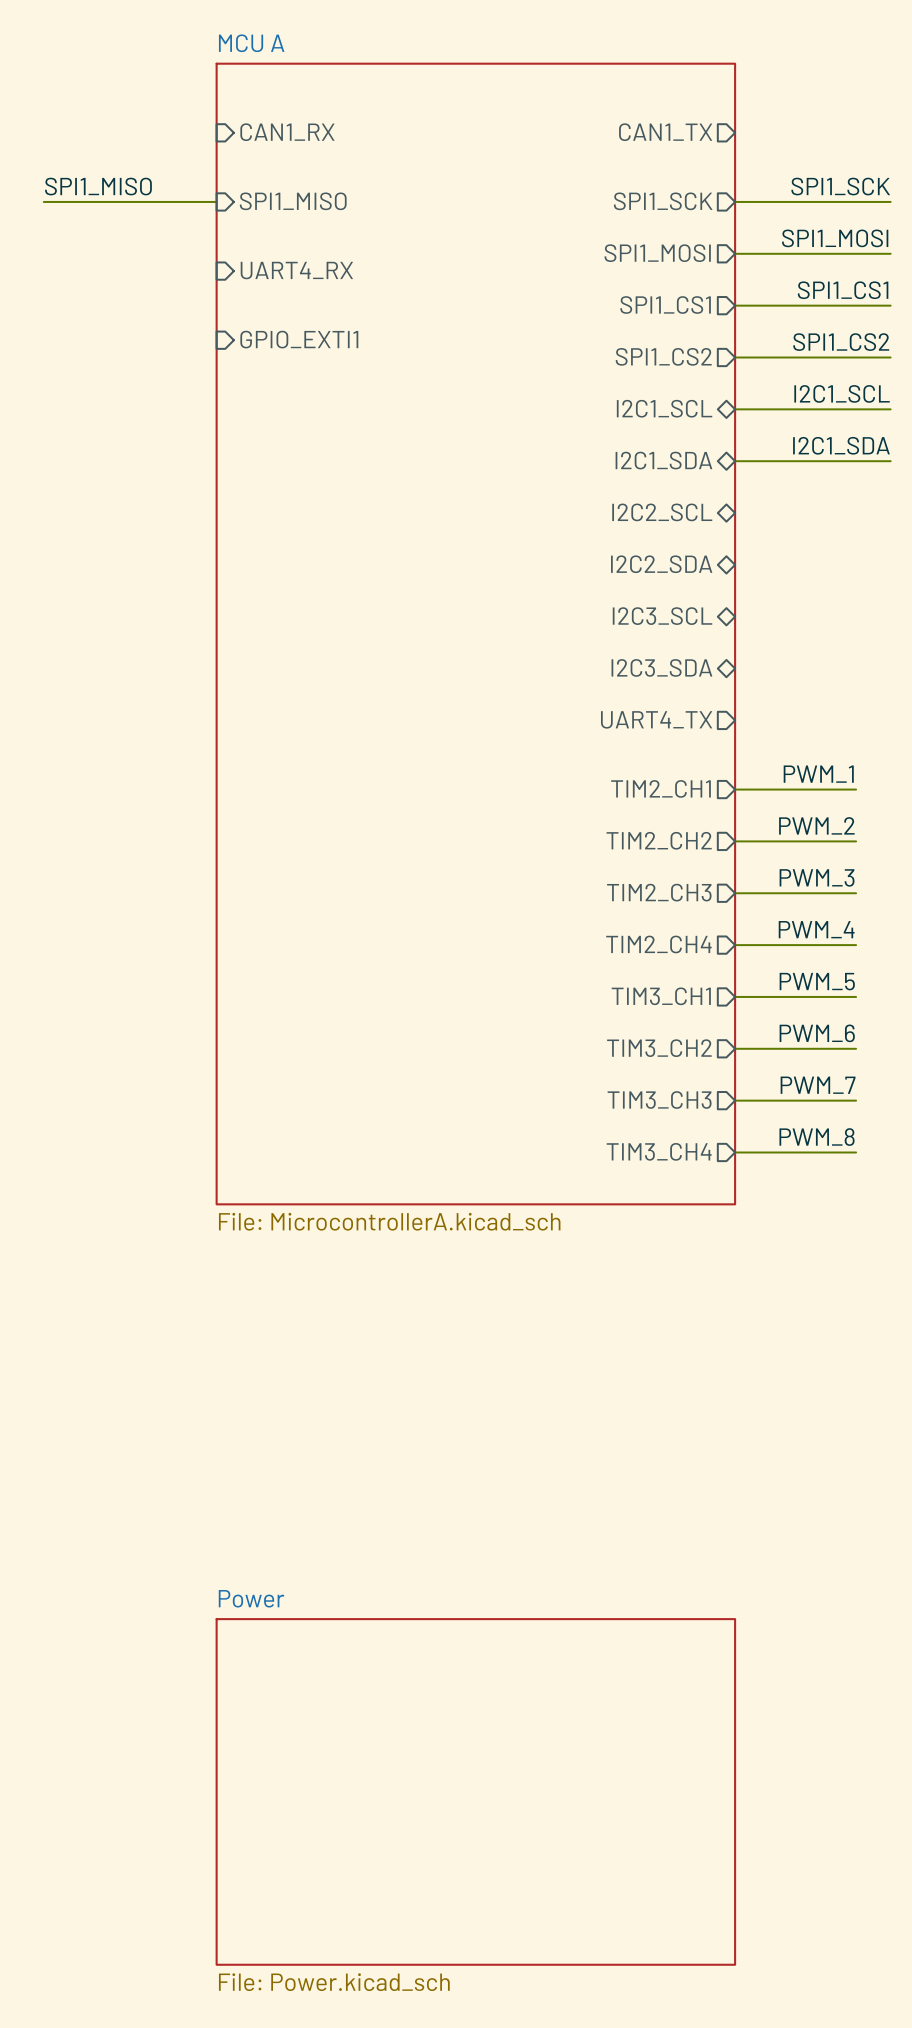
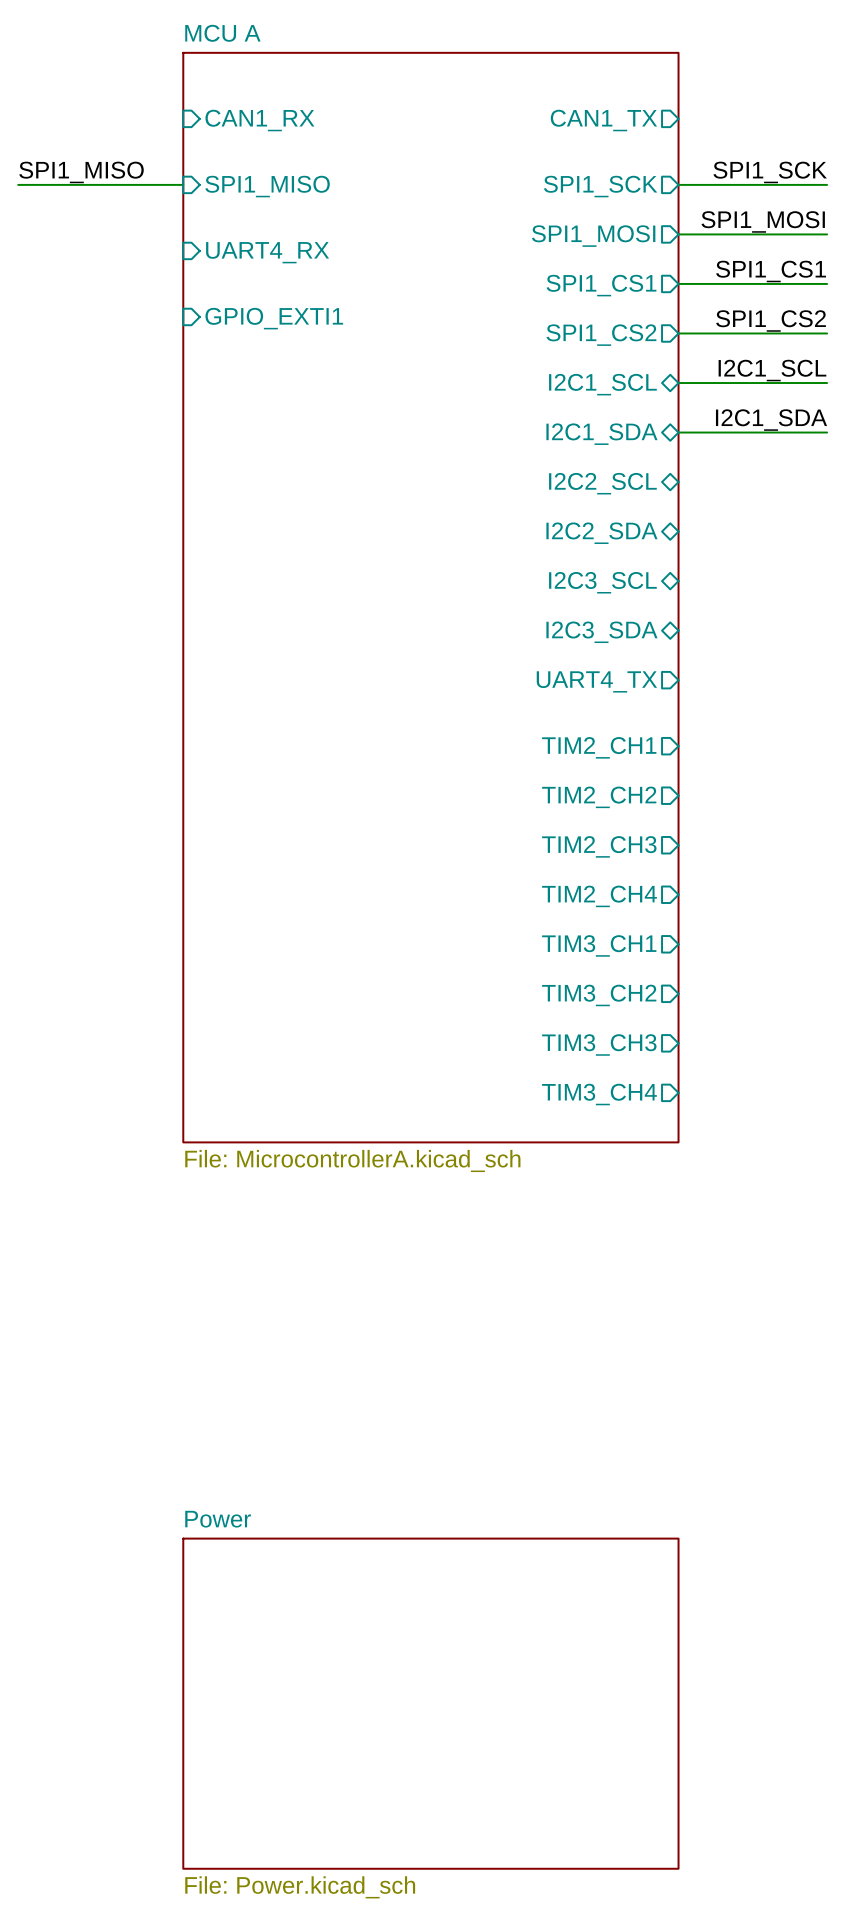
label: PWM_1 (818, 774) -> none
wire: (735, 789) (856, 789) -> none
label: PWM_2 (816, 825) -> none
wire: (735, 841) (856, 841) -> none
label: PWM_3 (817, 877) -> none
wire: (735, 893) (856, 893) -> none
label: PWM_4 (816, 929) -> none
wire: (735, 945) (856, 945) -> none
label: PWM_5 (817, 981) -> none
wire: (735, 996) (856, 996) -> none
label: PWM_6 (817, 1033) -> none
wire: (735, 1048) (856, 1048) -> none
label: PWM_7 (818, 1085) -> none
wire: (735, 1100) (856, 1100) -> none
label: PWM_8 (817, 1137) -> none
wire: (735, 1152) (856, 1152) -> none

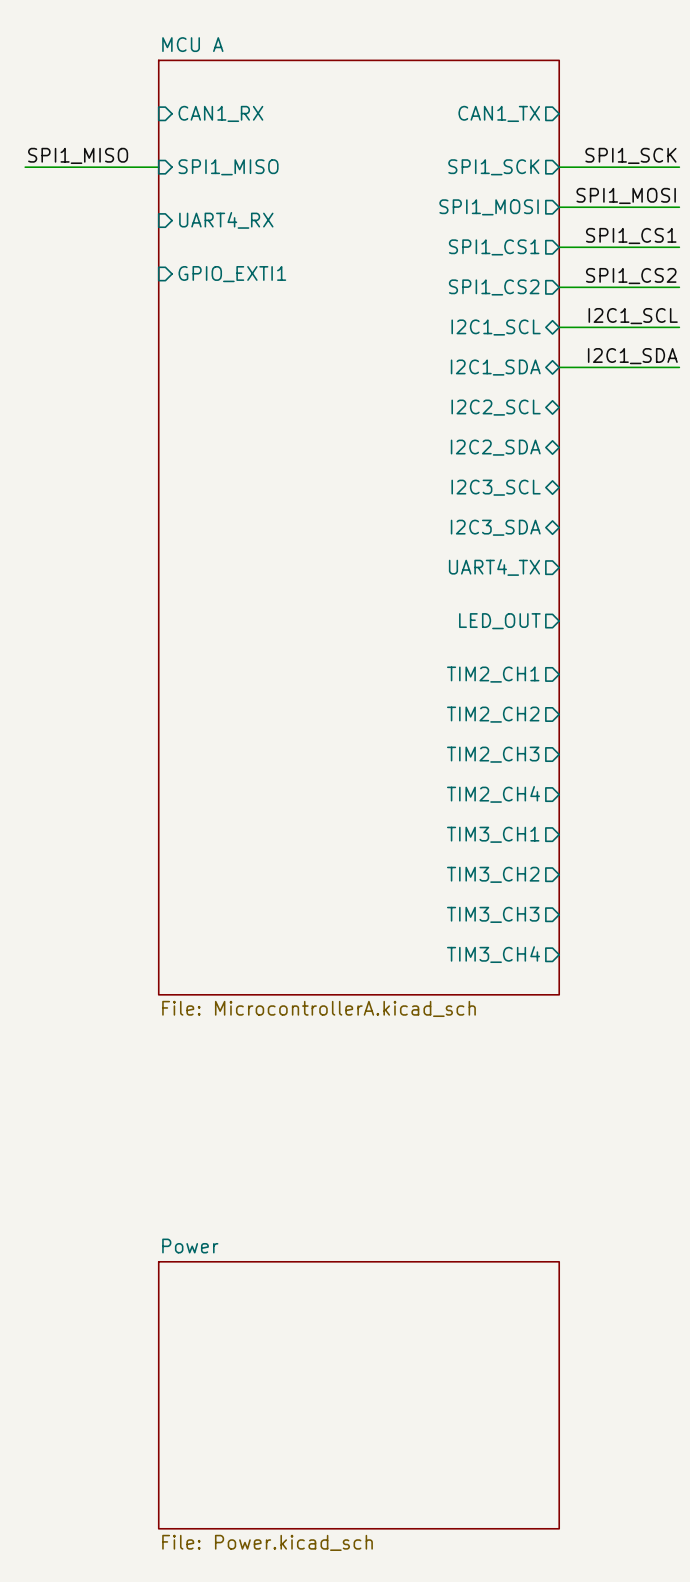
sheet MCU A: File: MicrocontrollerA.kicad_sch (430, 597) -> none
sheet MCU A: none -> File: MicrocontrollerA.kicad_sch (358, 527)
sheet pin: TIM2_CH1 (599, 747) -> LED_OUT (499, 621)
sheet pin position: TIM2_CH2 (599, 797) -> TIM2_CH2 (493, 714)
sheet pin: none -> TIM2_CH1 (493, 674)
sheet pin position: TIM2_CH3 (599, 846) -> TIM2_CH3 (493, 754)
sheet pin position: TIM2_CH4 (599, 896) -> TIM2_CH4 (493, 794)
sheet pin position: TIM3_CH1 (599, 945) -> TIM3_CH1 (493, 834)
sheet pin position: TIM3_CH2 (599, 995) -> TIM3_CH2 (493, 874)
sheet pin position: TIM3_CH3 (599, 1044) -> TIM3_CH3 (493, 914)
sheet pin position: TIM3_CH4 (599, 1094) -> TIM3_CH4 (493, 954)

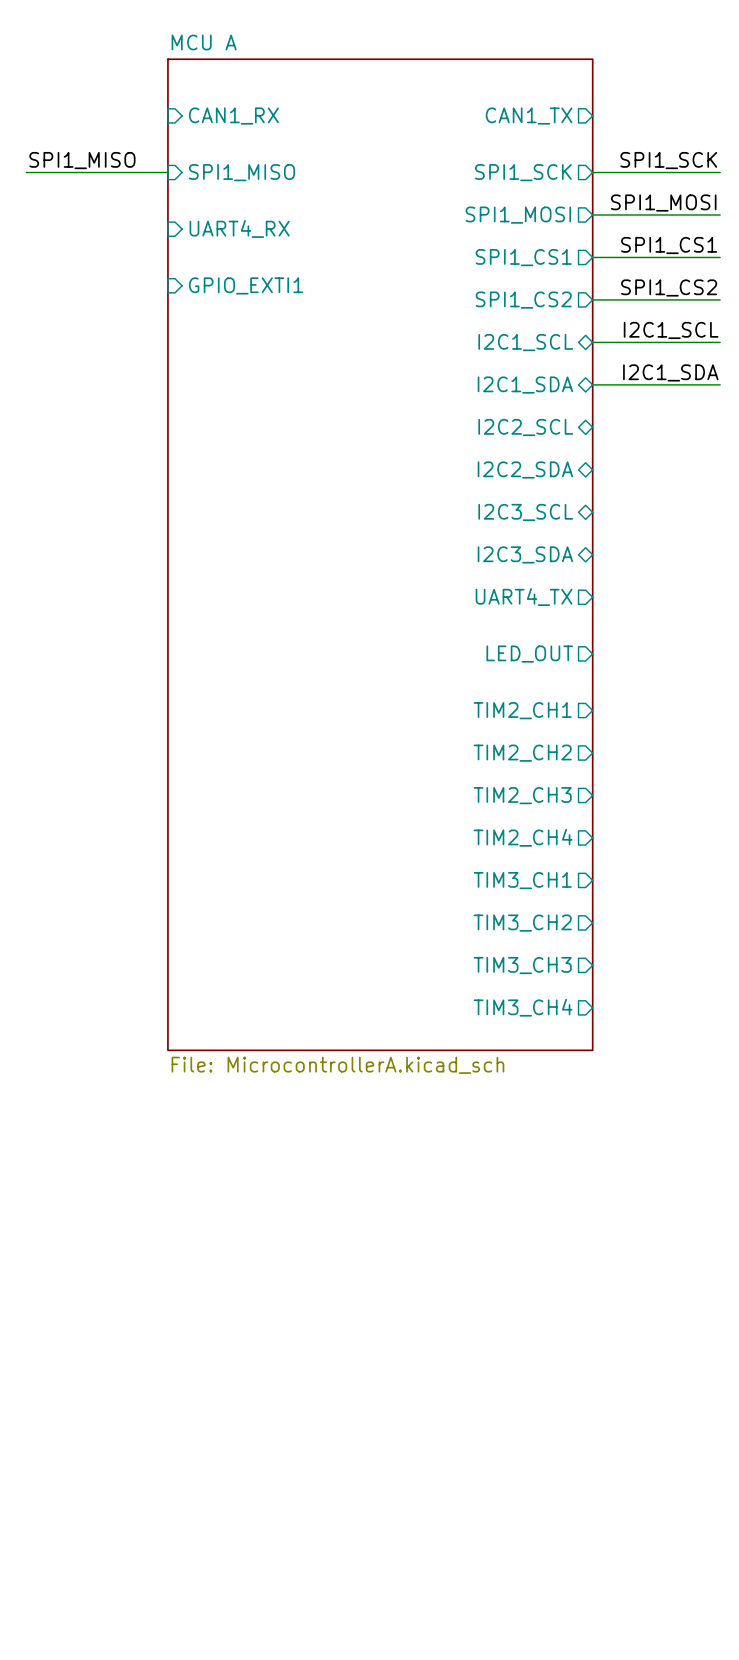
sheet Power: File: Power.kicad_sch (358, 1395) -> none

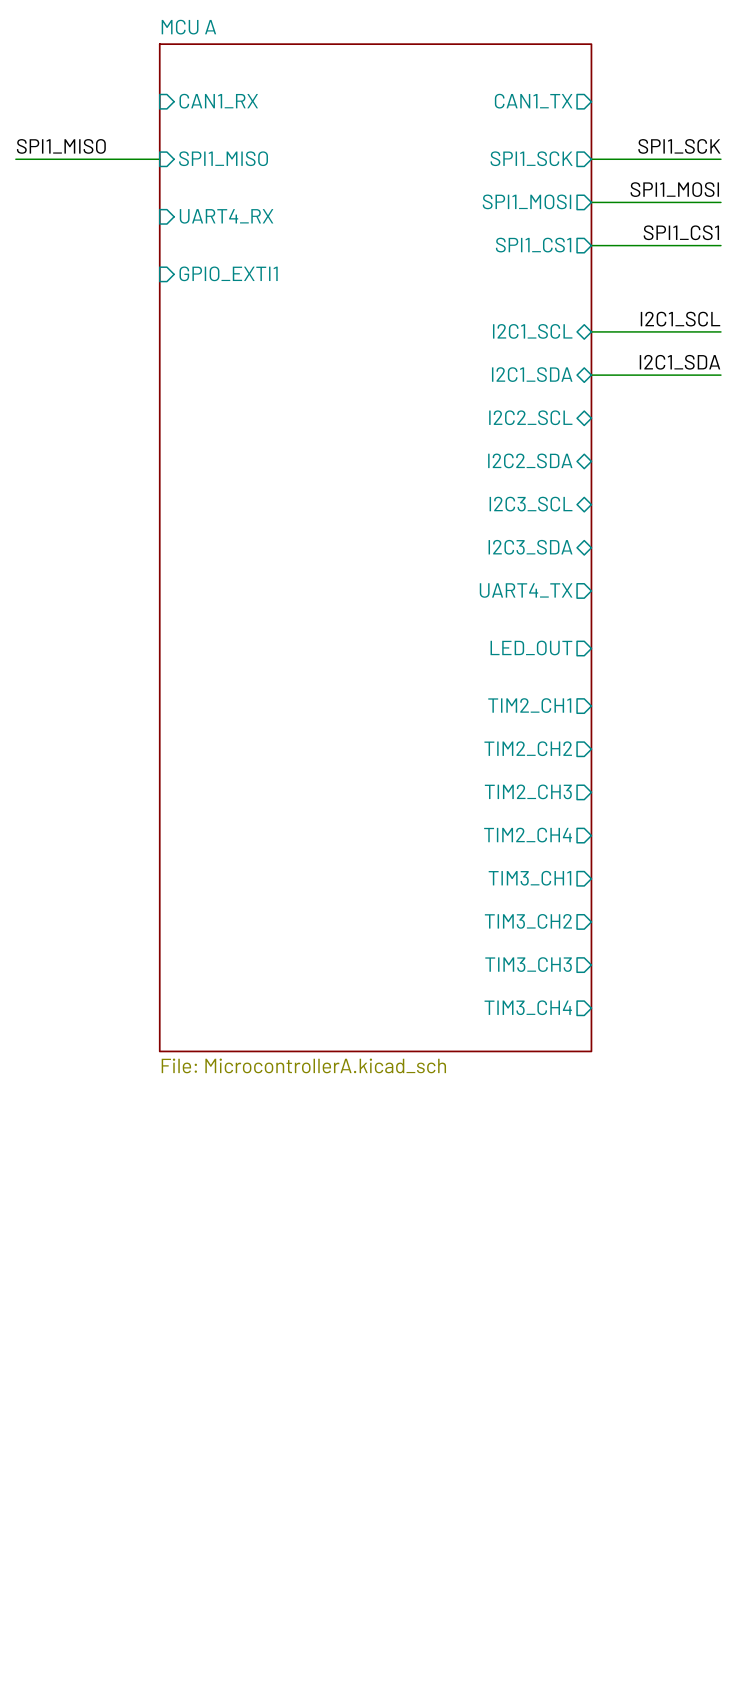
label: SPI1_CS2 (669, 287) -> none
wire: (592, 299) (720, 299) -> none
sheet pin: SPI1_CS2 (523, 300) -> none

